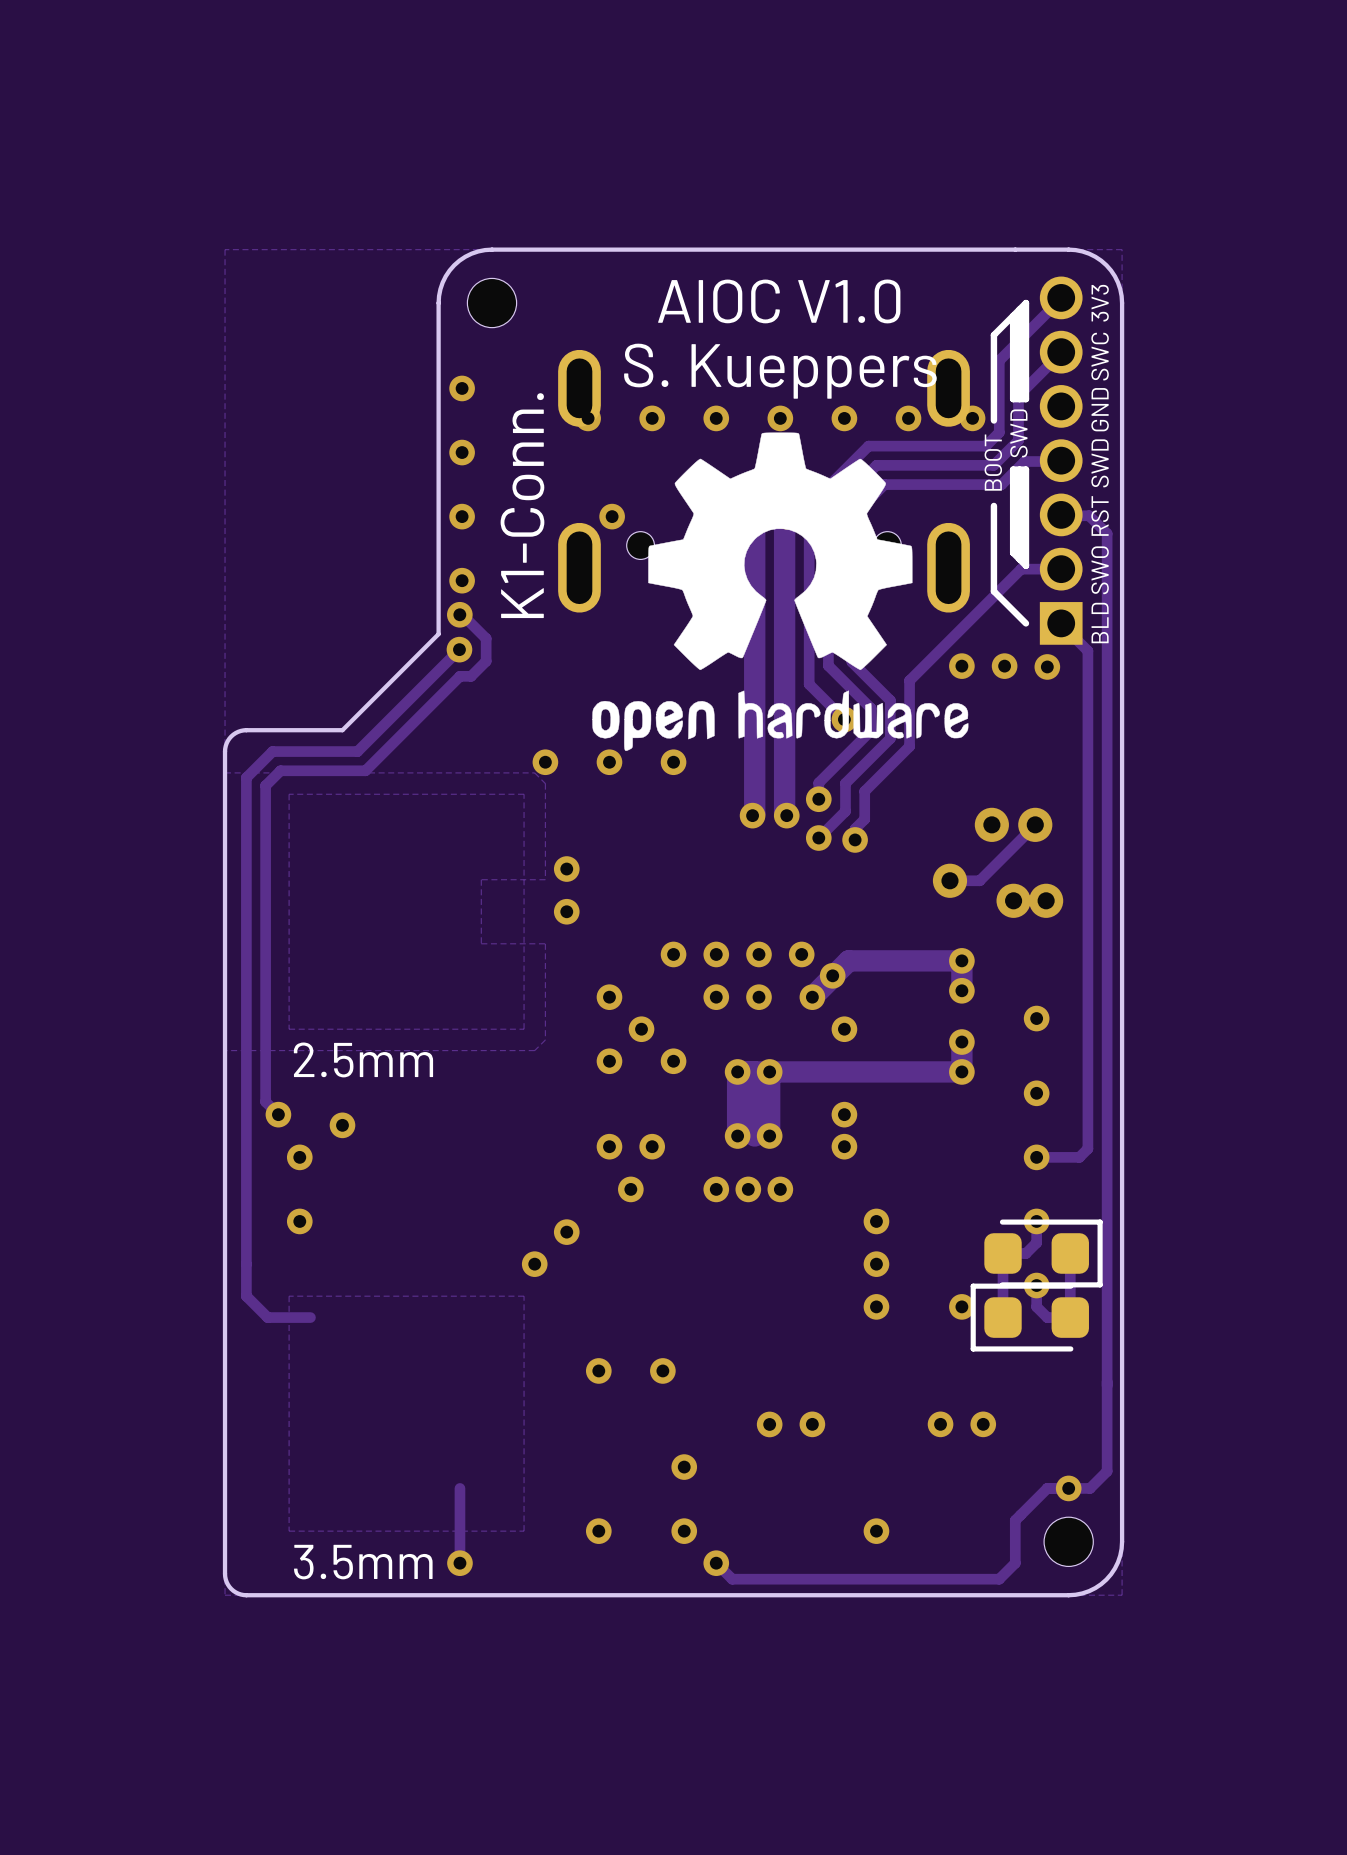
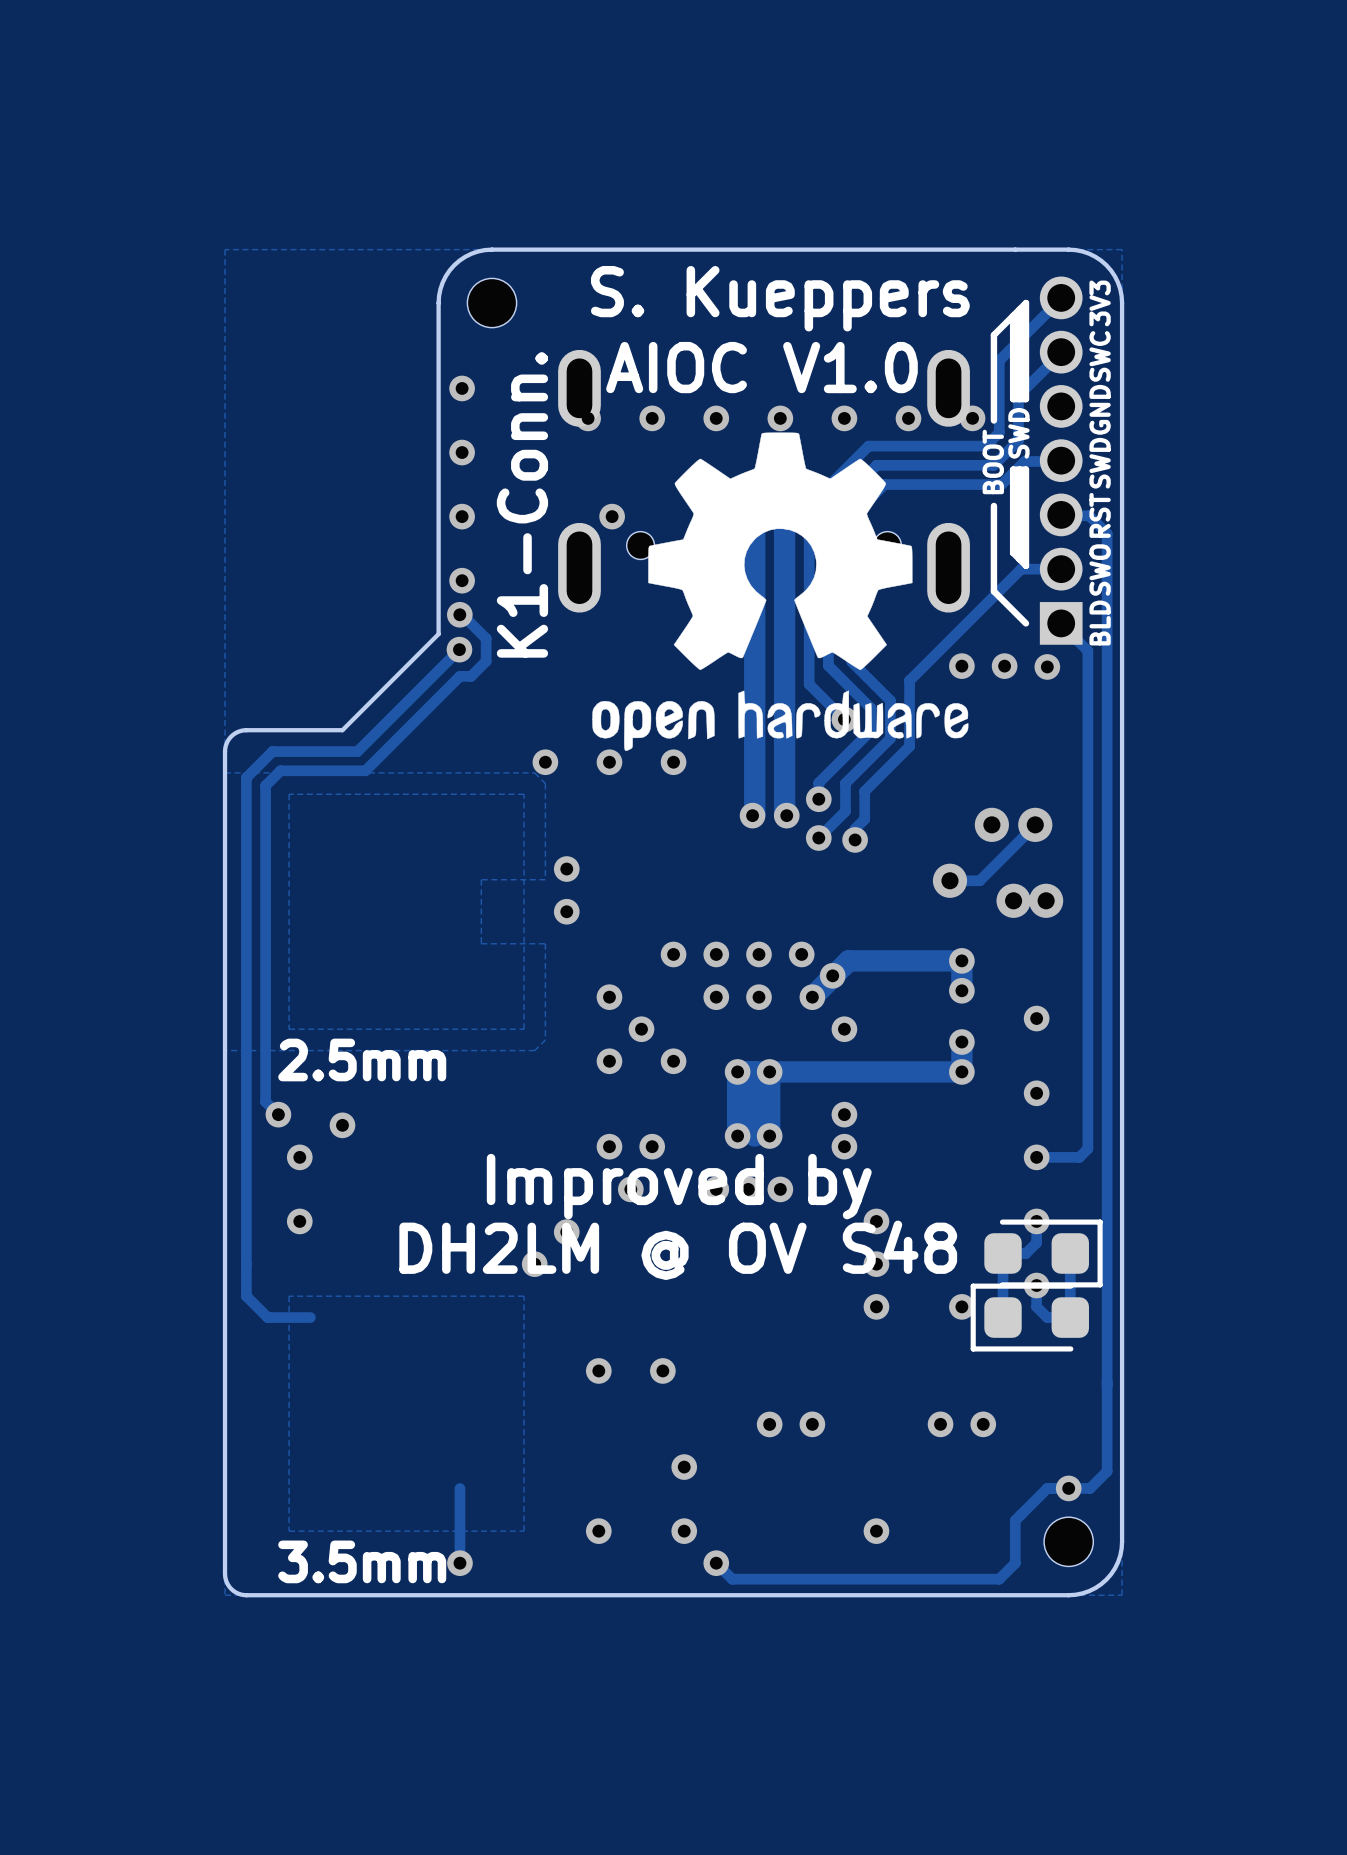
text: AIOC V1.0 (779, 301) -> S. Kueppers (780, 298)
text: S. Kueppers (780, 371) -> AIOC V1.0 (761, 367)
text: none -> Improved by (679, 1186)
text: none -> DH2LM @ OV S48 (678, 1250)

